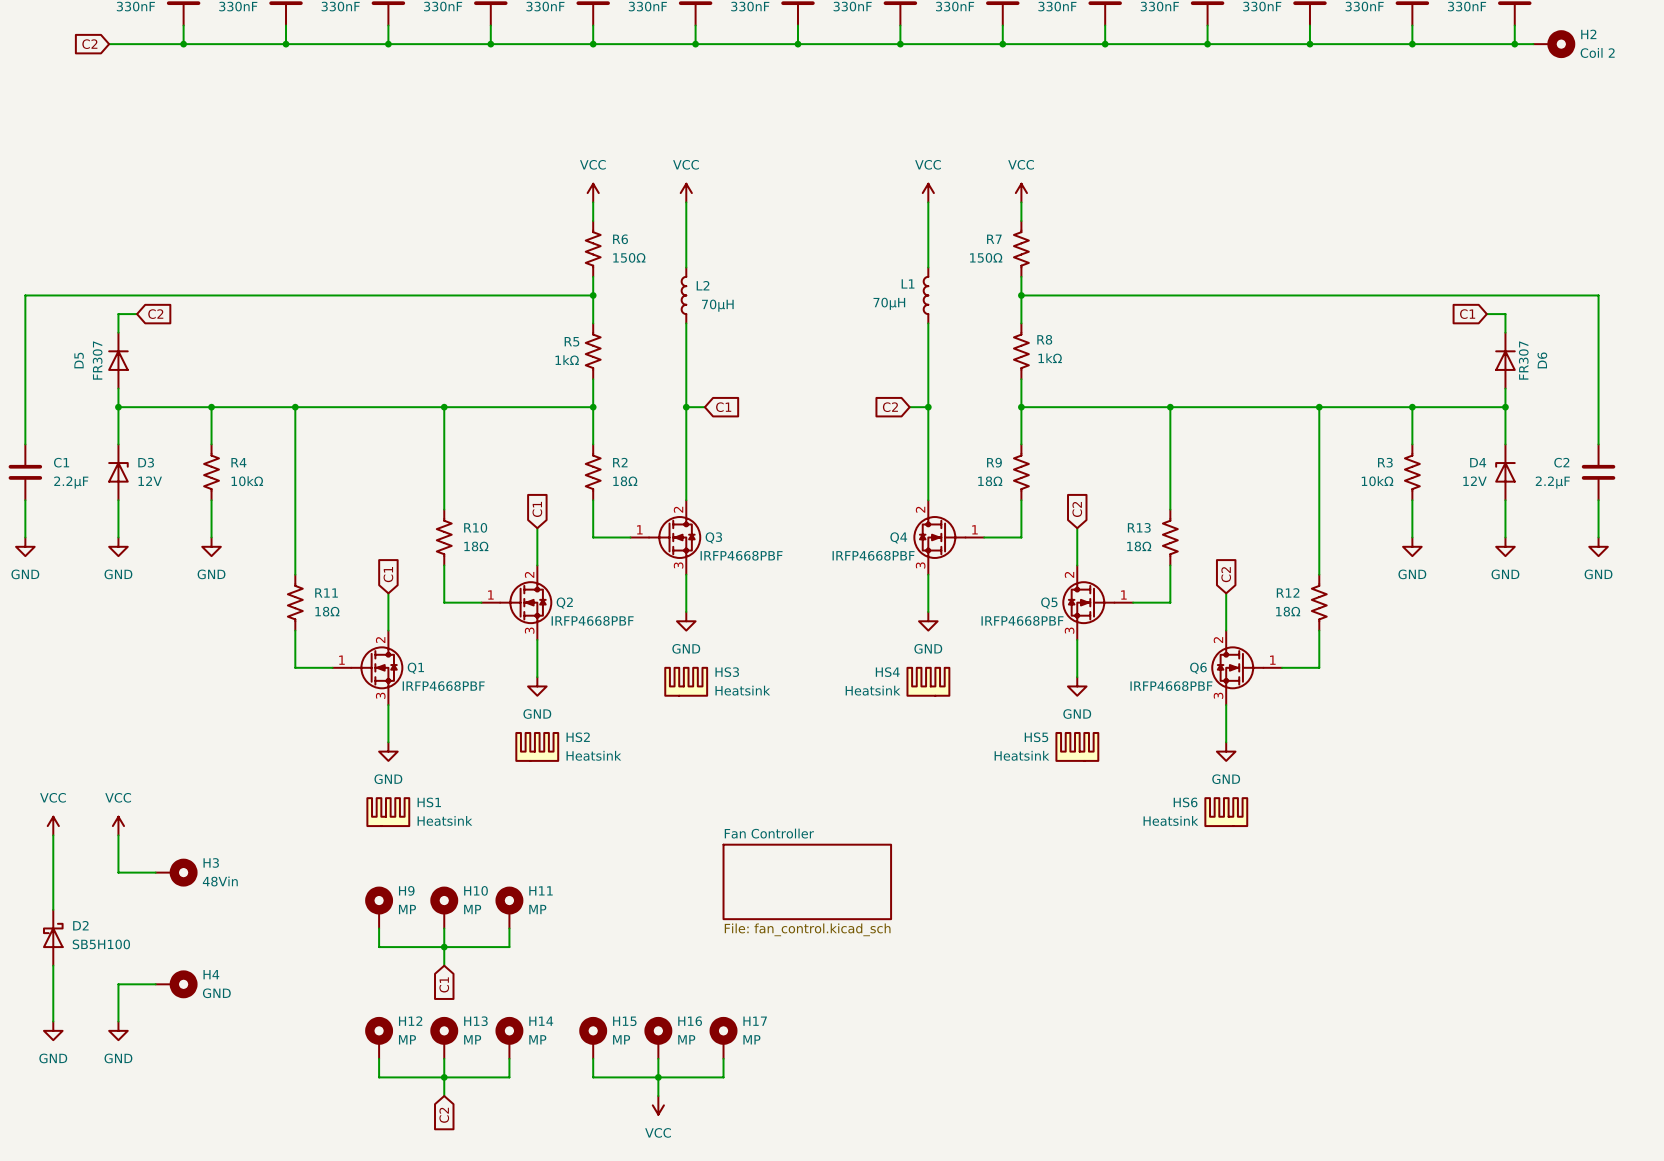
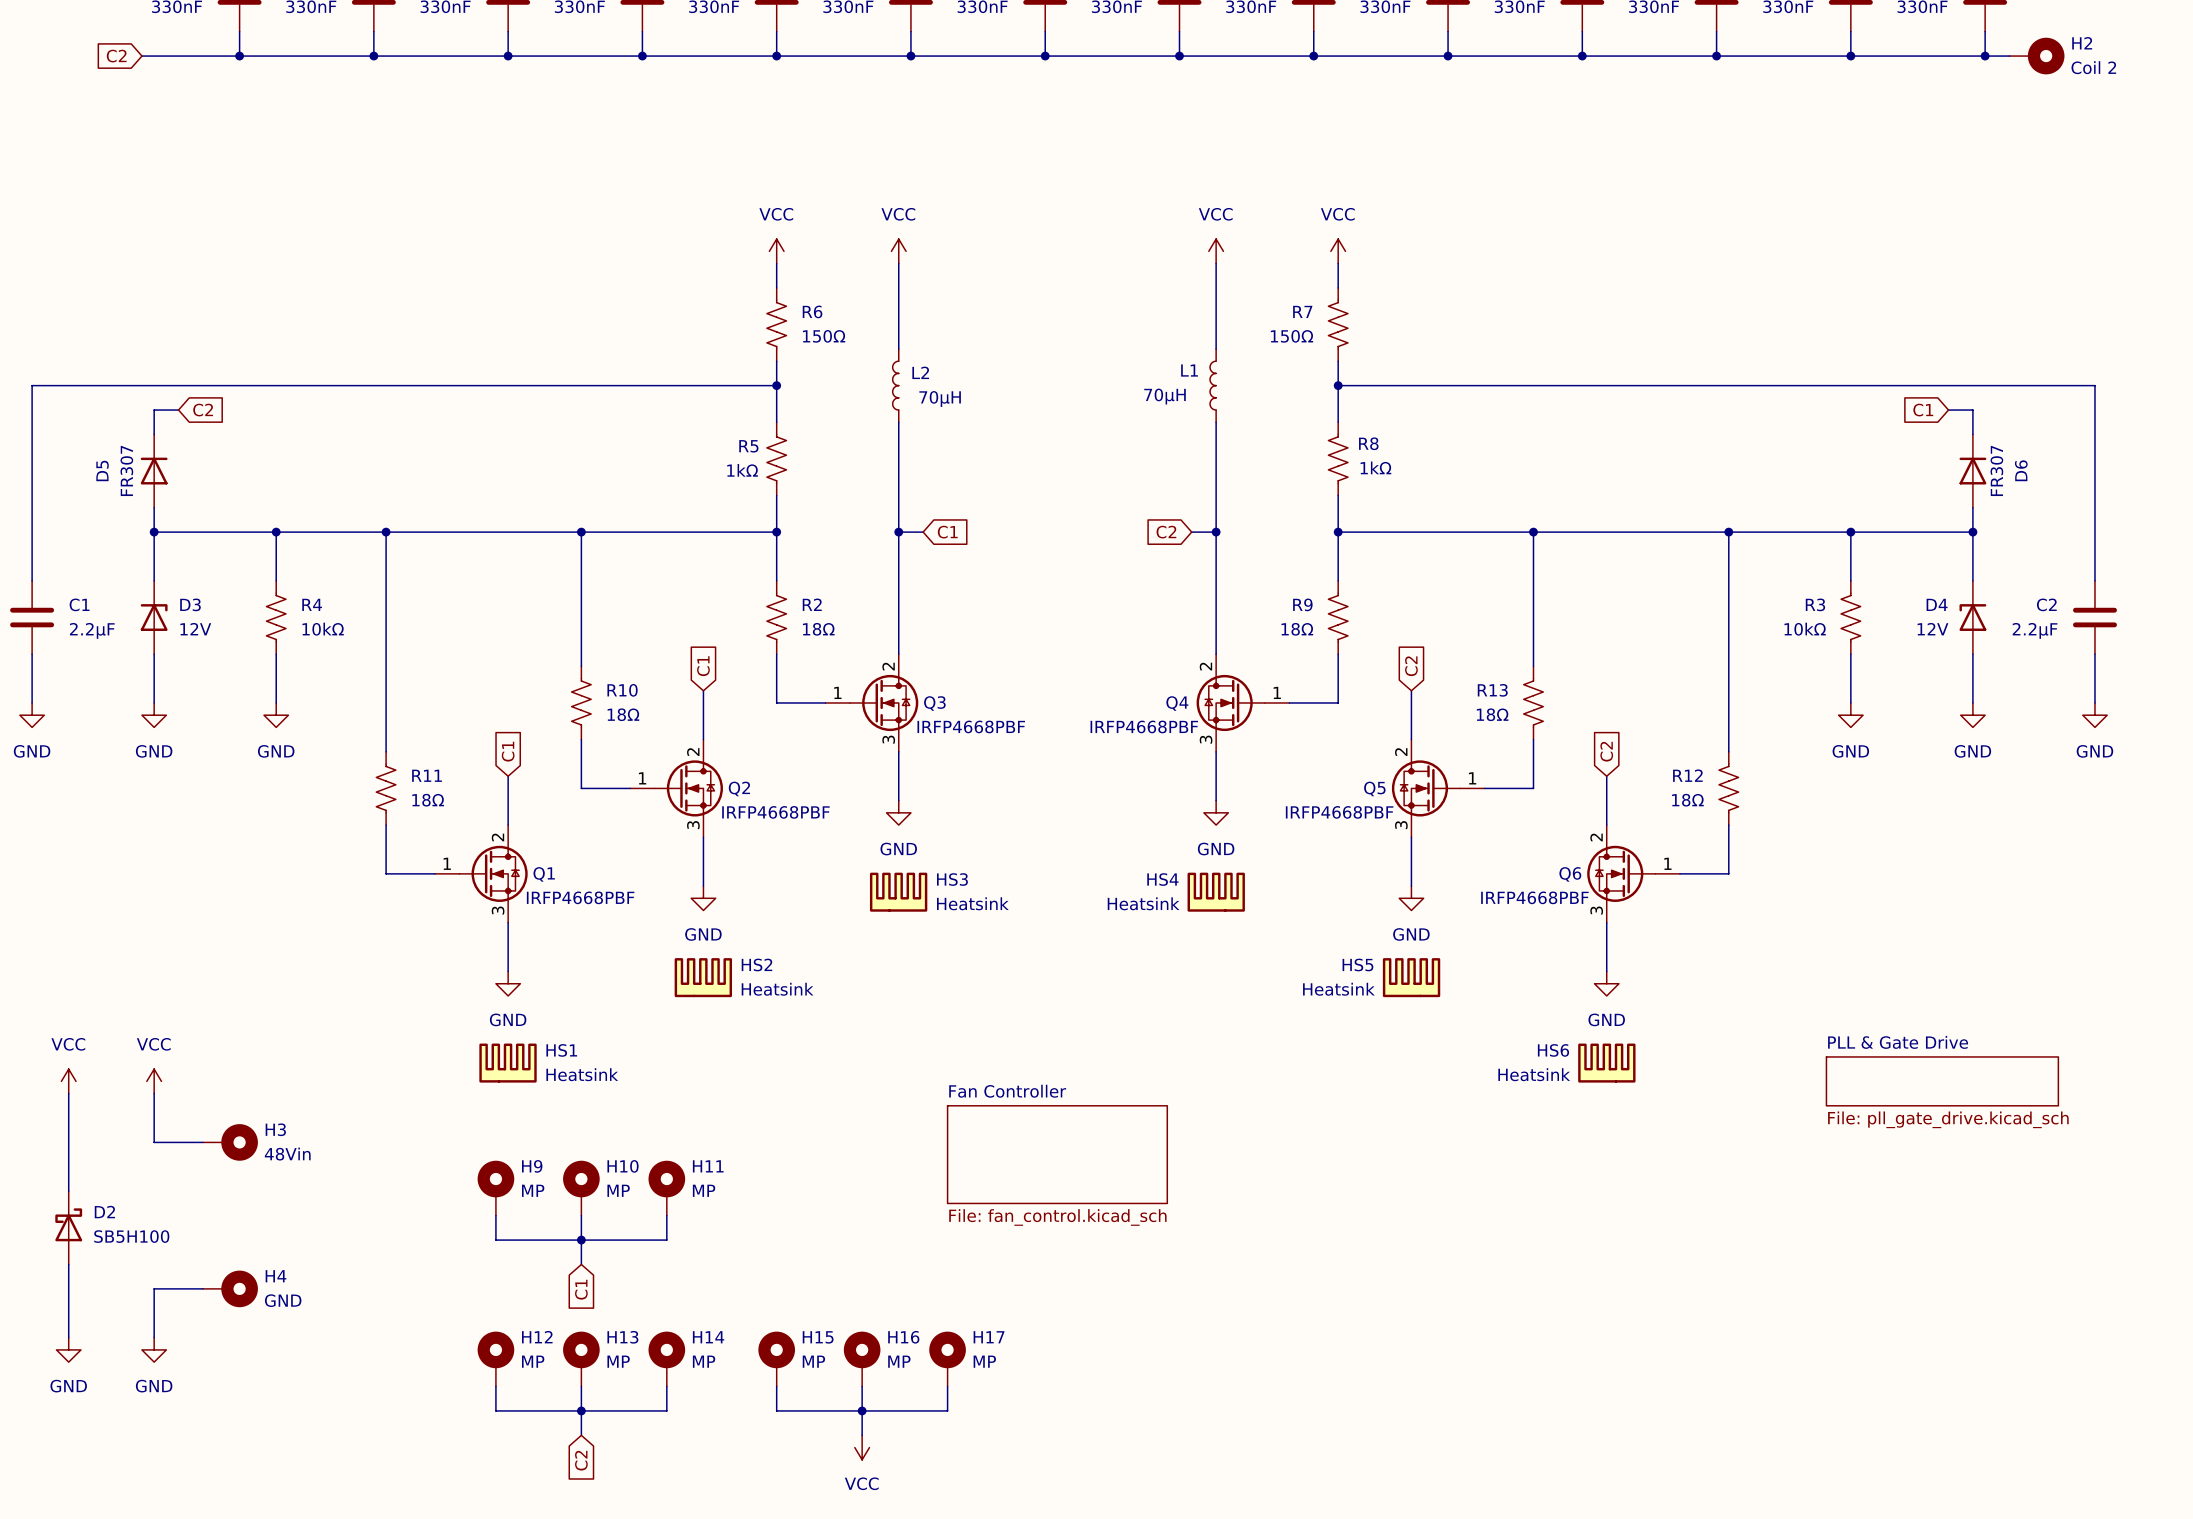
sheet PLL & Gate Drive: none -> File: pll_gate_drive.kicad_sch (1942, 1081)

